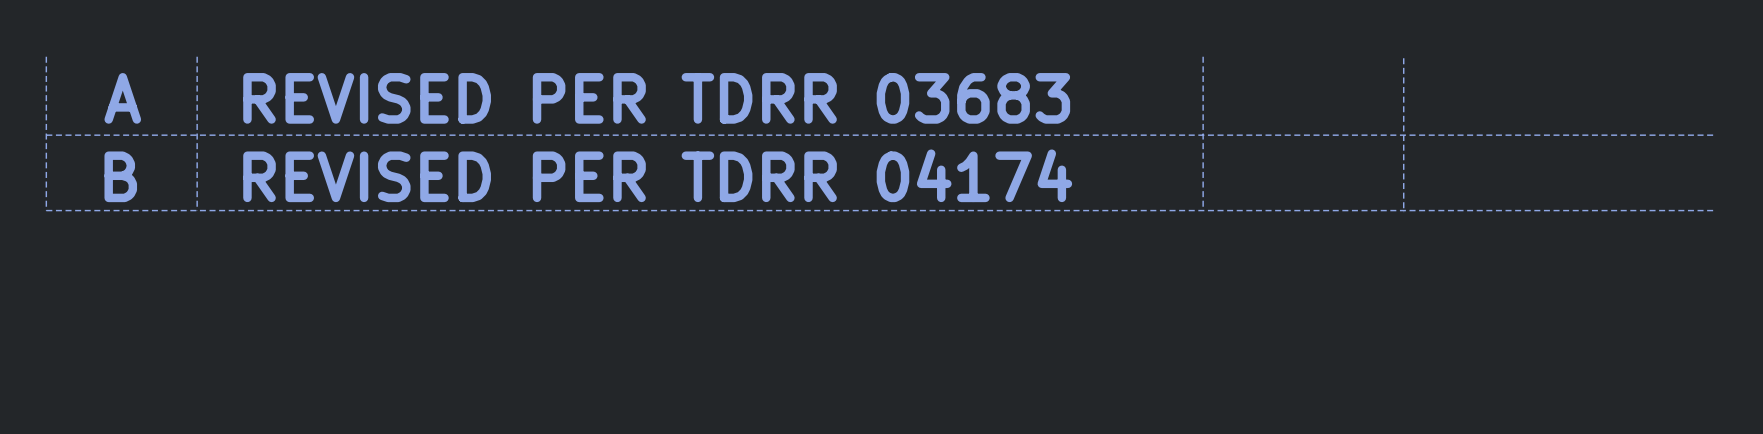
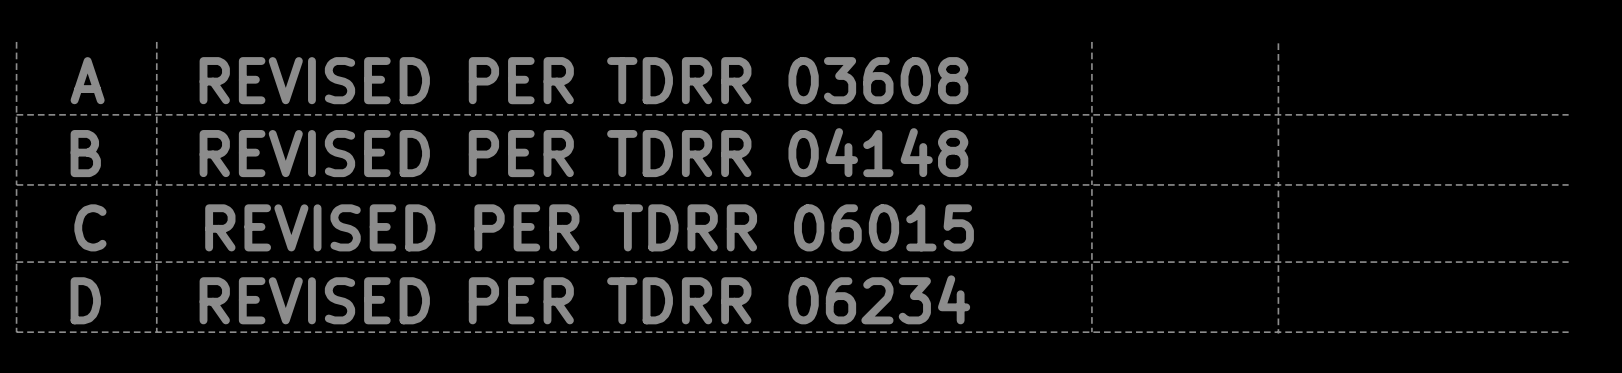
text: A REVISED PER TDRR 03683 (587, 98) -> A REVISED PER TDRR 03608 (519, 80)
text: B REVISED PER TDRR 04174 (588, 175) -> B REVISED PER TDRR 04148 (519, 152)
line: none -> (16, 189) (16, 332) (1568, 332)
line: none -> (156, 189) (156, 332)
line: none -> (1091, 189) (1091, 332)
line: none -> (1278, 190) (1278, 333)
text: none -> C REVISED PER TDRR 06015 (524, 227)
line: none -> (16, 262) (1568, 262)
text: none -> D REVISED PER TDRR 06234 (520, 299)

